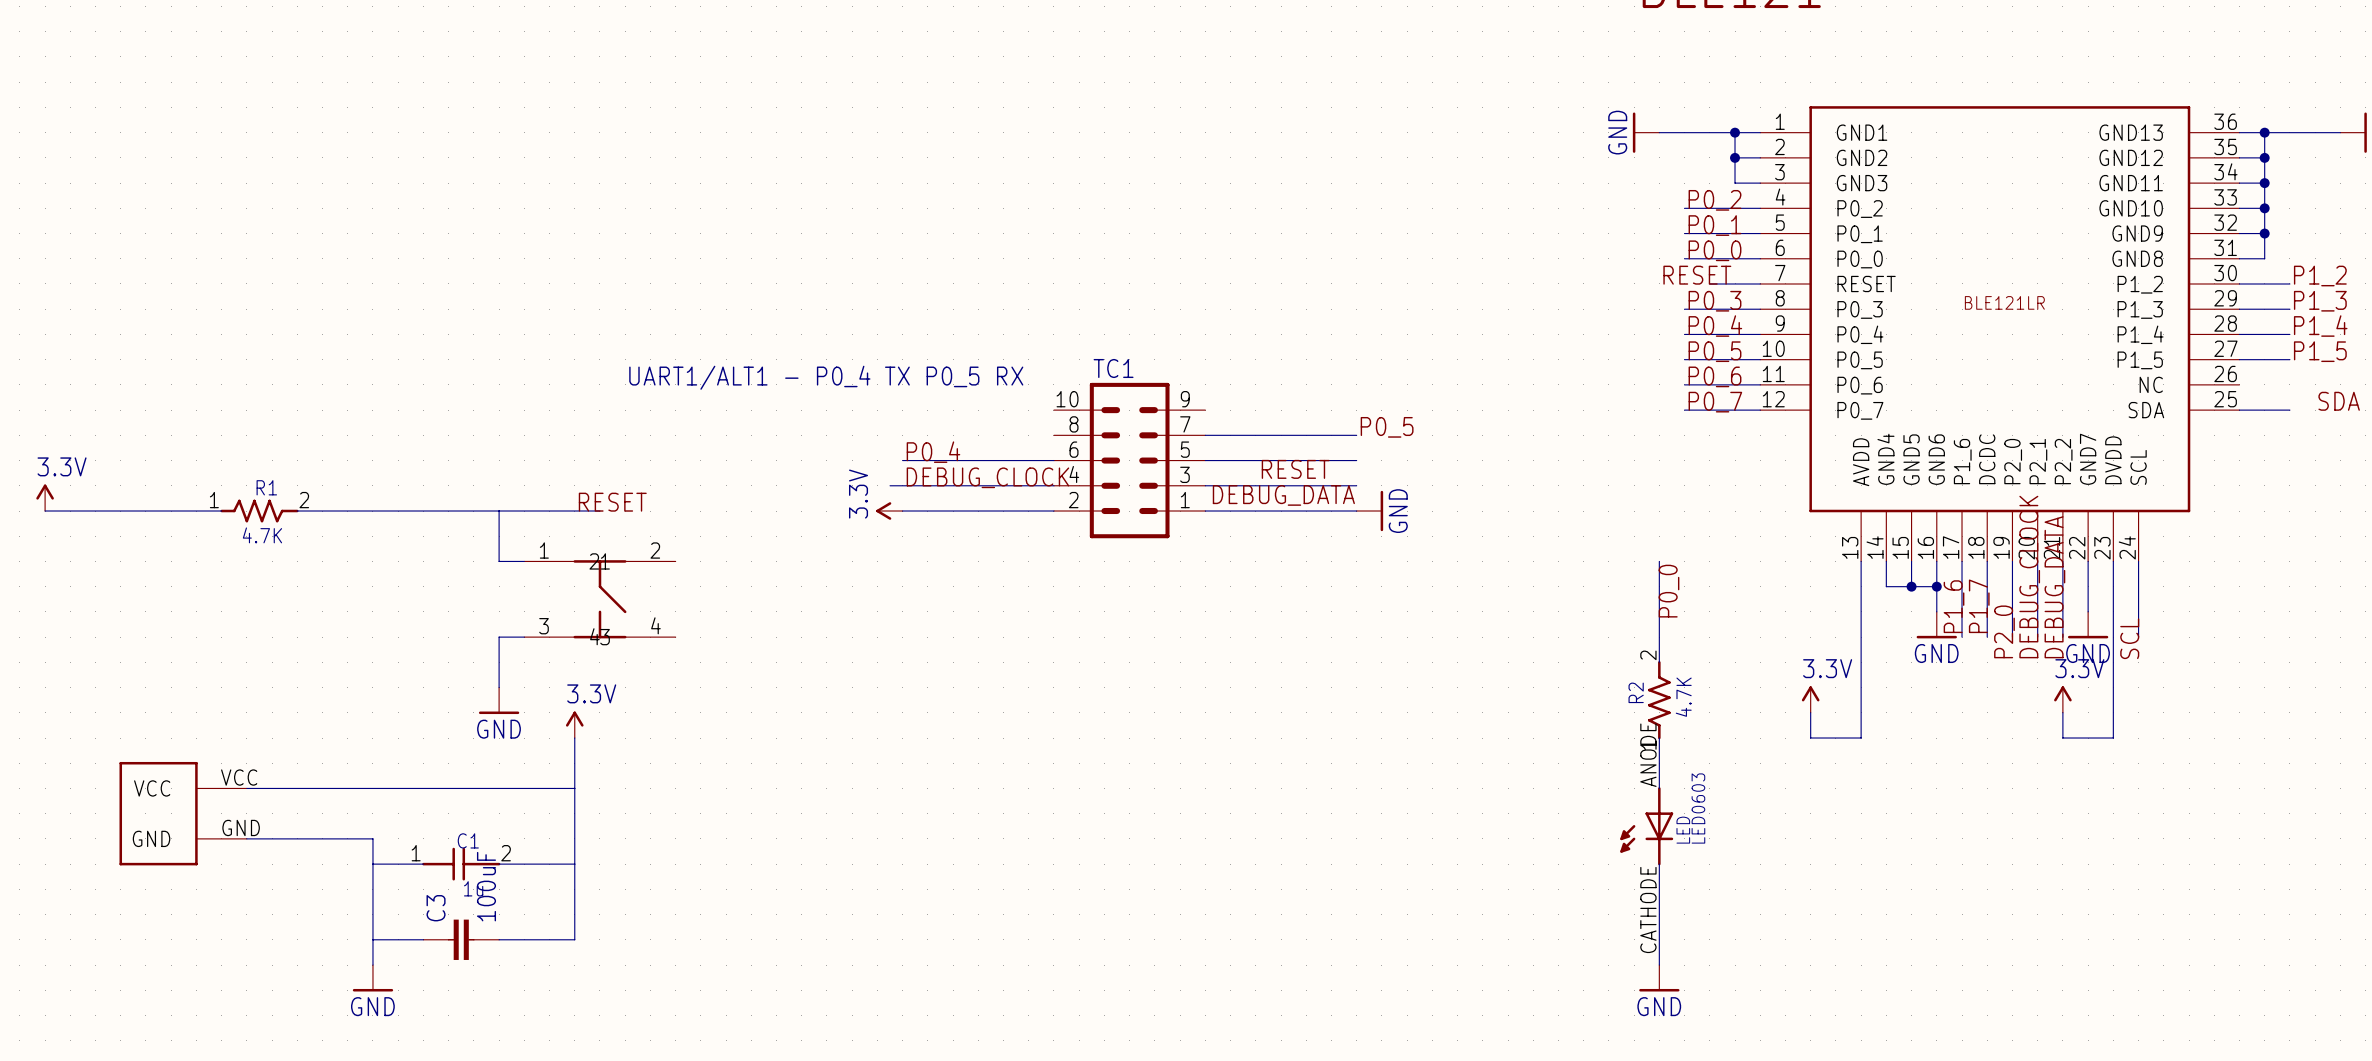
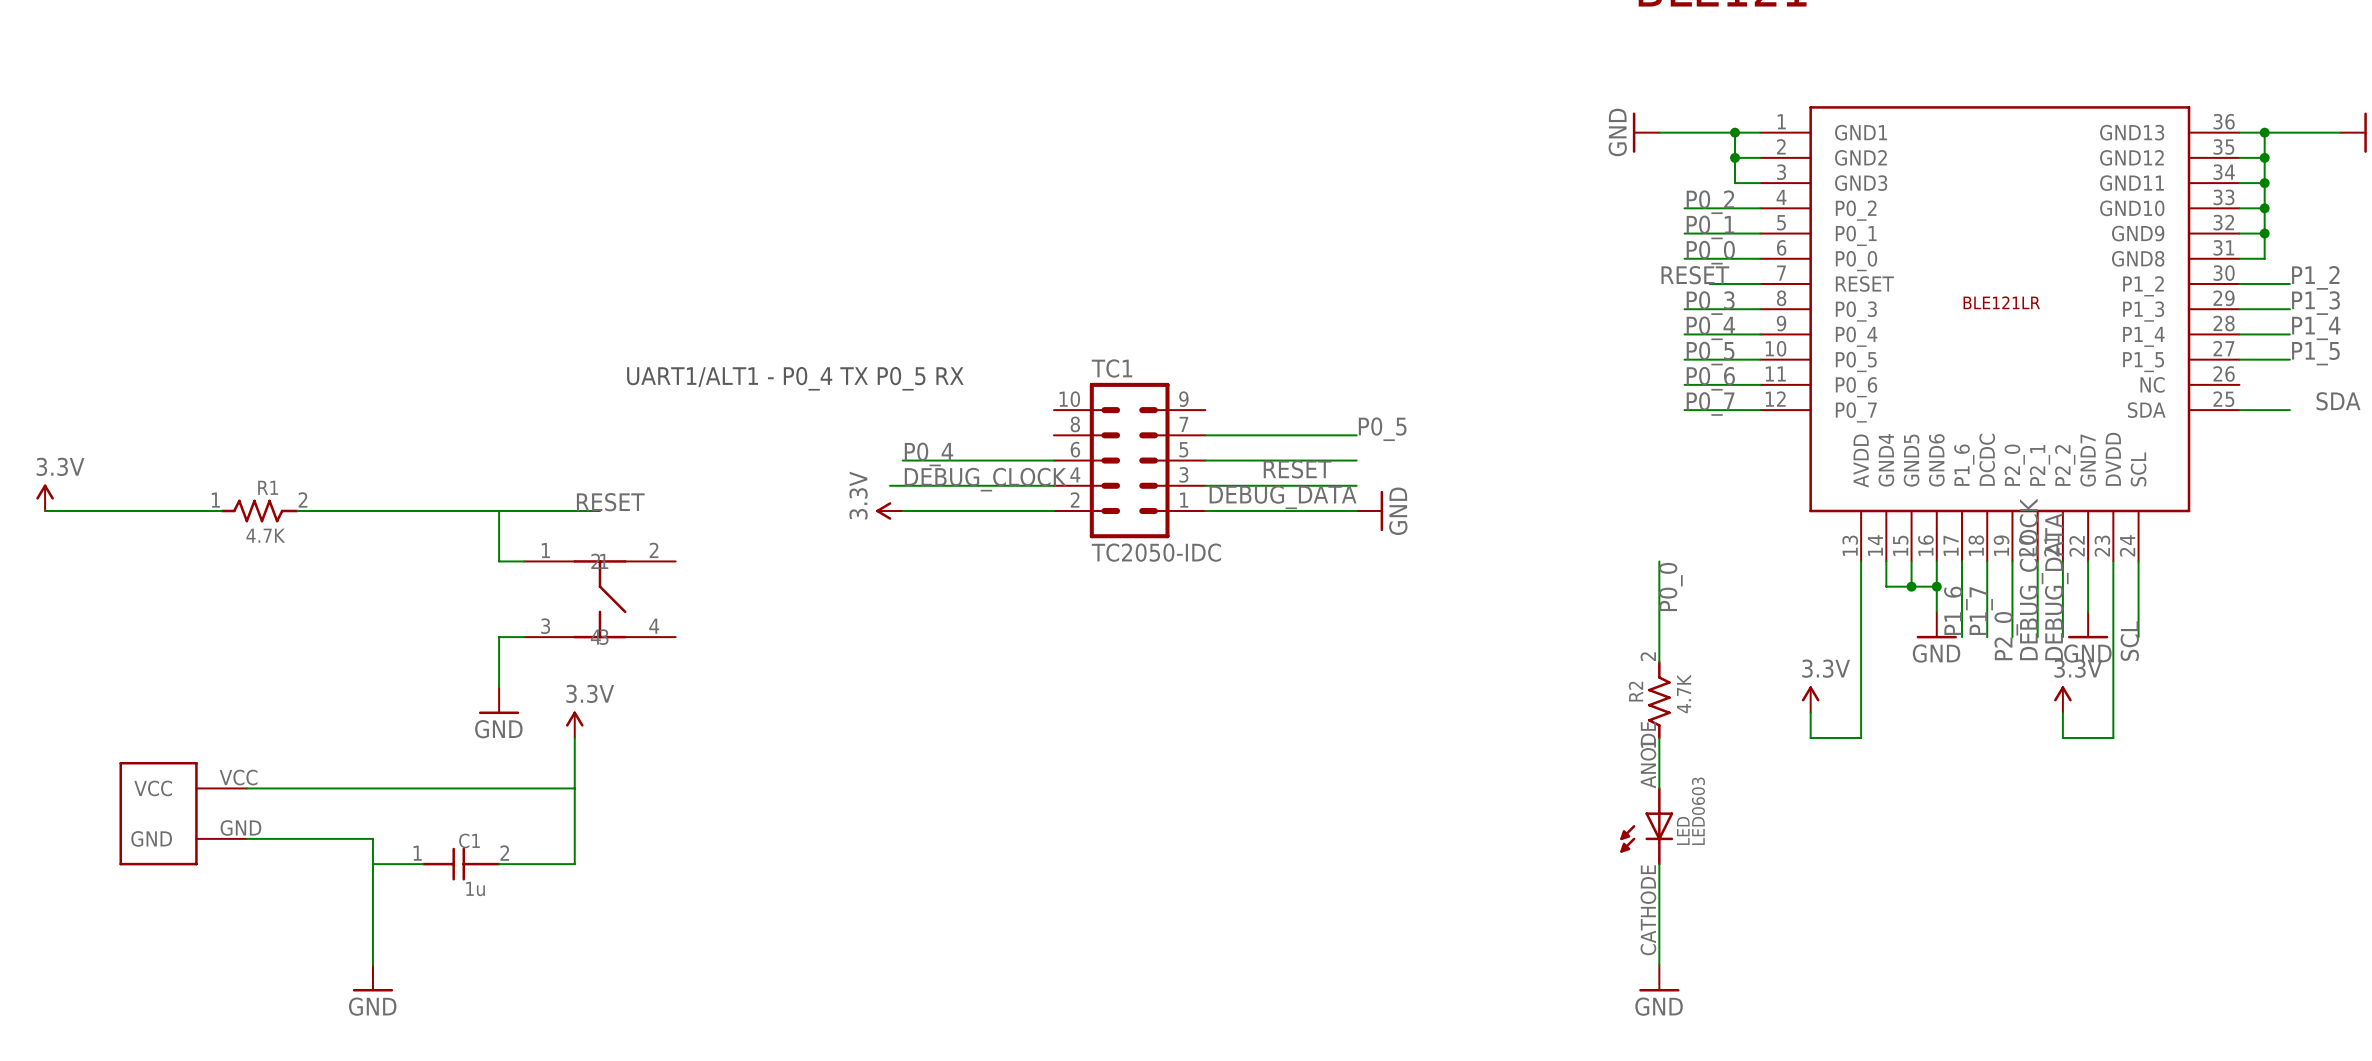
TC1 value: none -> TC2050-IDC (1156, 552)
wire: (574, 864) (574, 939) (499, 939) -> none
wire: (372, 939) (423, 939) -> none
C3: 100uF (461, 939) -> none

